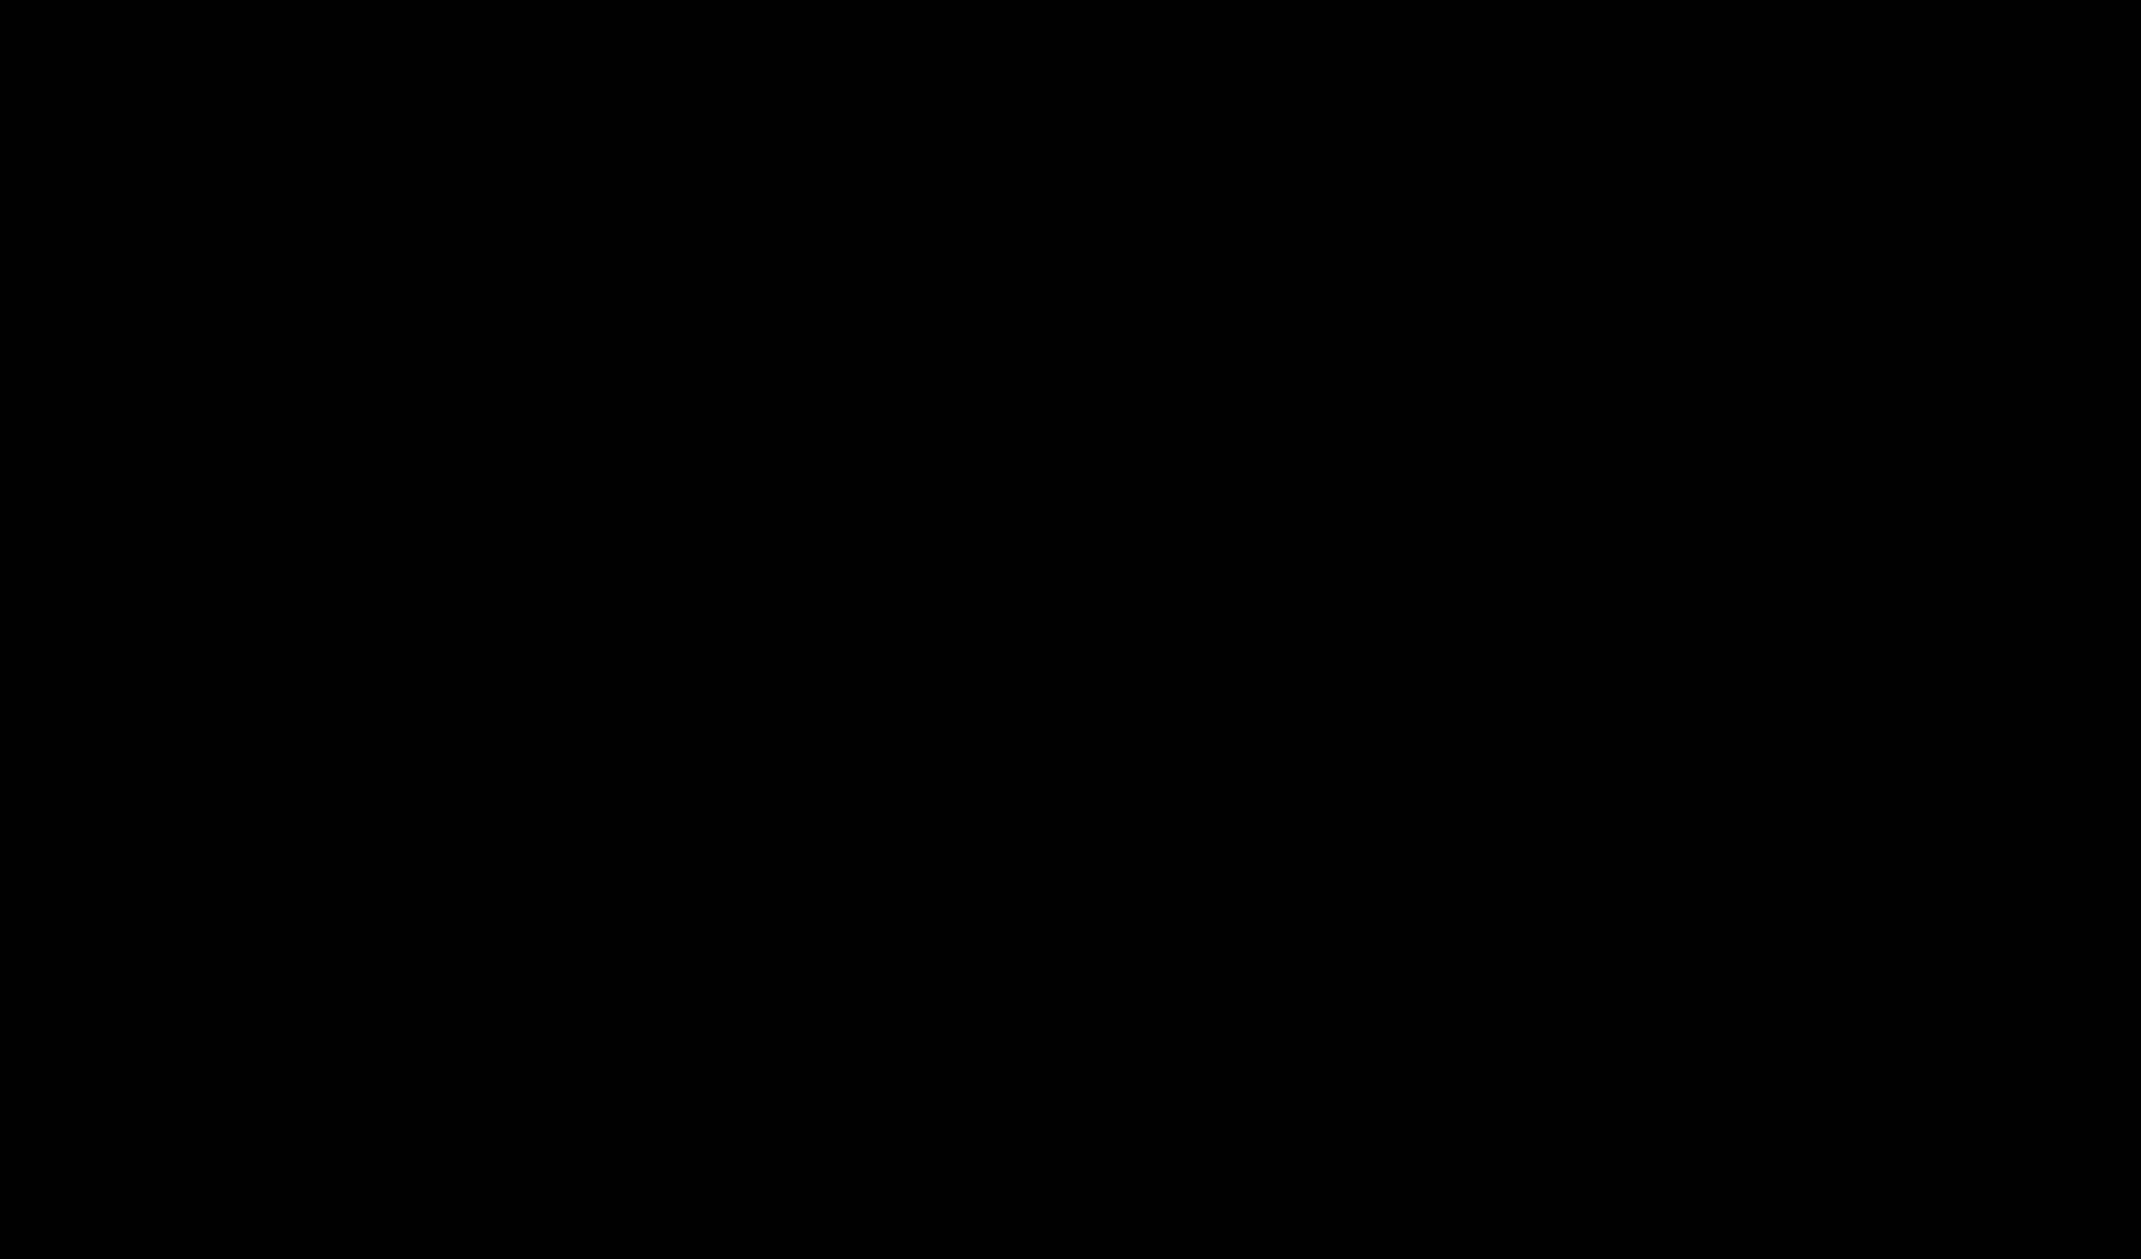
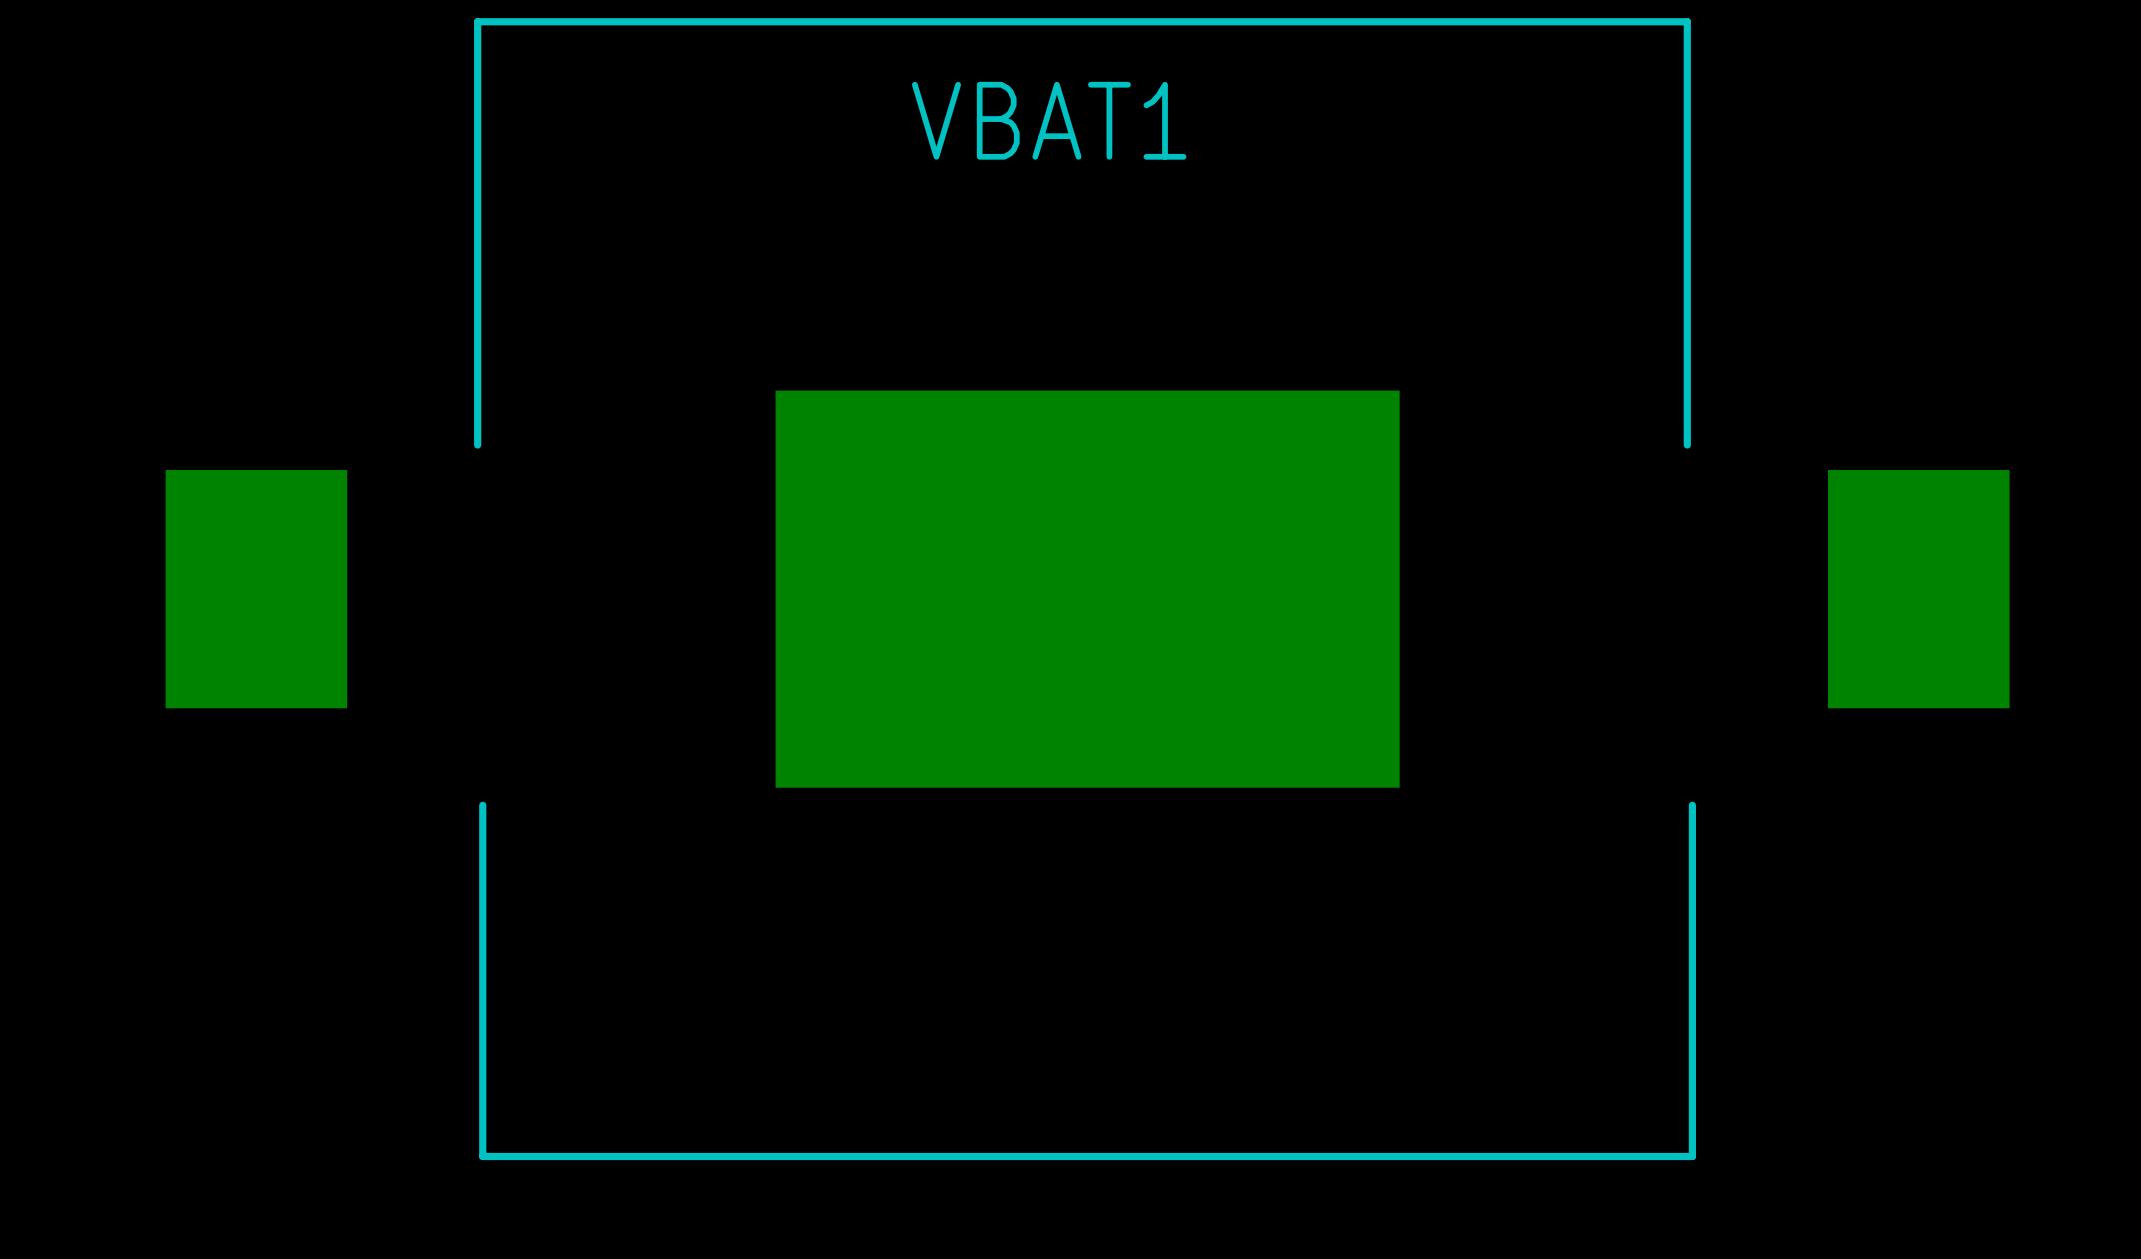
VBAT1: none -> (1087, 589)

